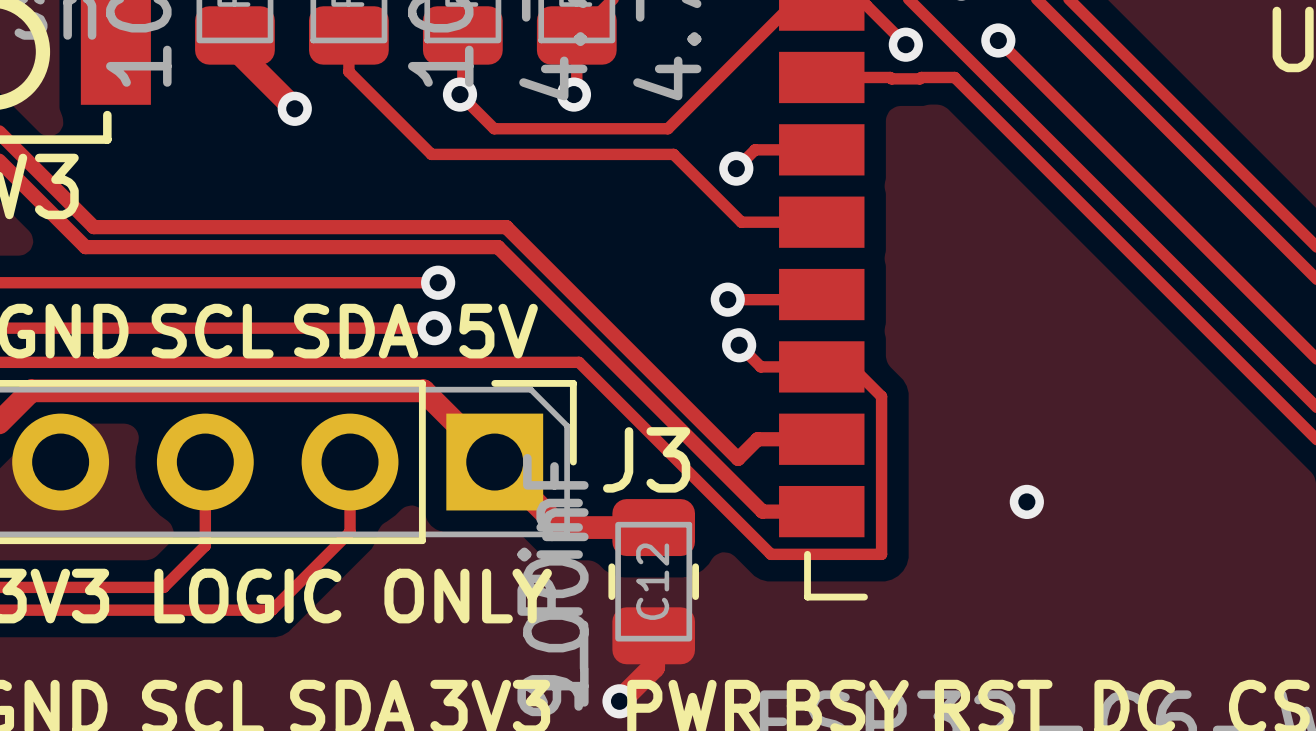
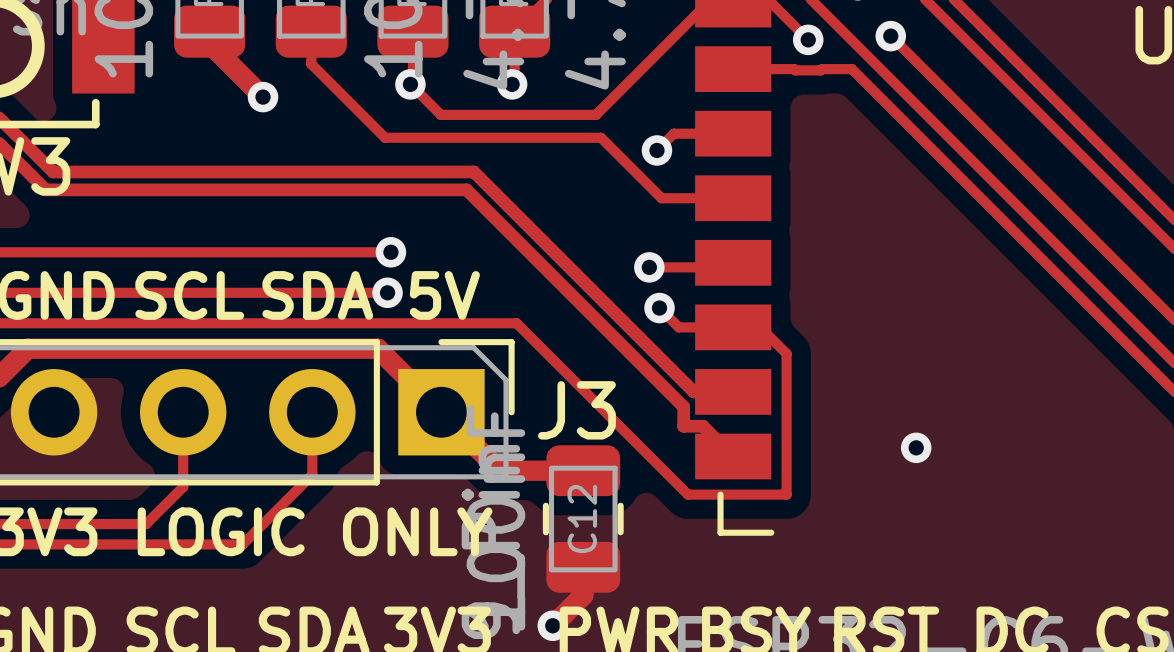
track: (59, 192) (93, 227) (506, 227) (738, 458) (757, 439) (777, 439) -> (53, 171) (473, 171) (693, 391)
track: (51, 212) (85, 247) (498, 247) (762, 511) (821, 511) -> (45, 189) (466, 189) (683, 406) (683, 426) (702, 426) (733, 456)

